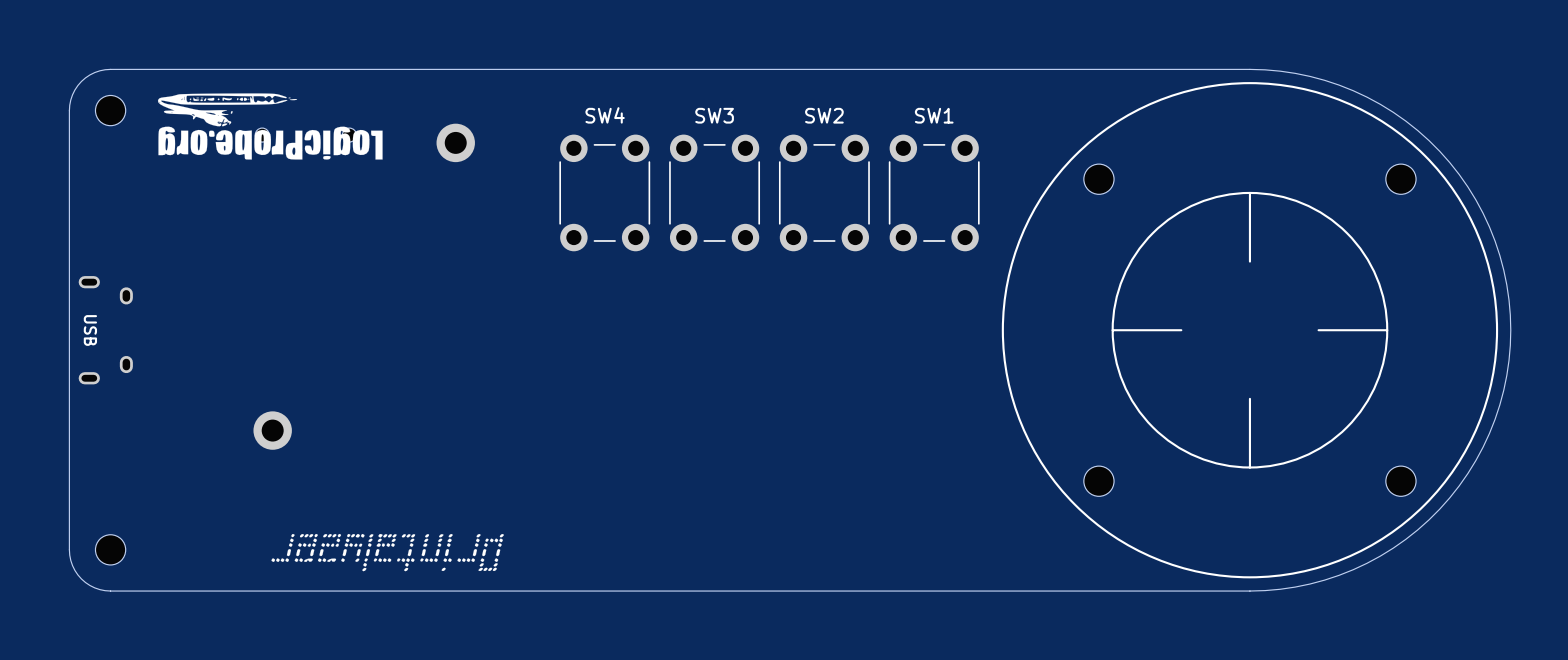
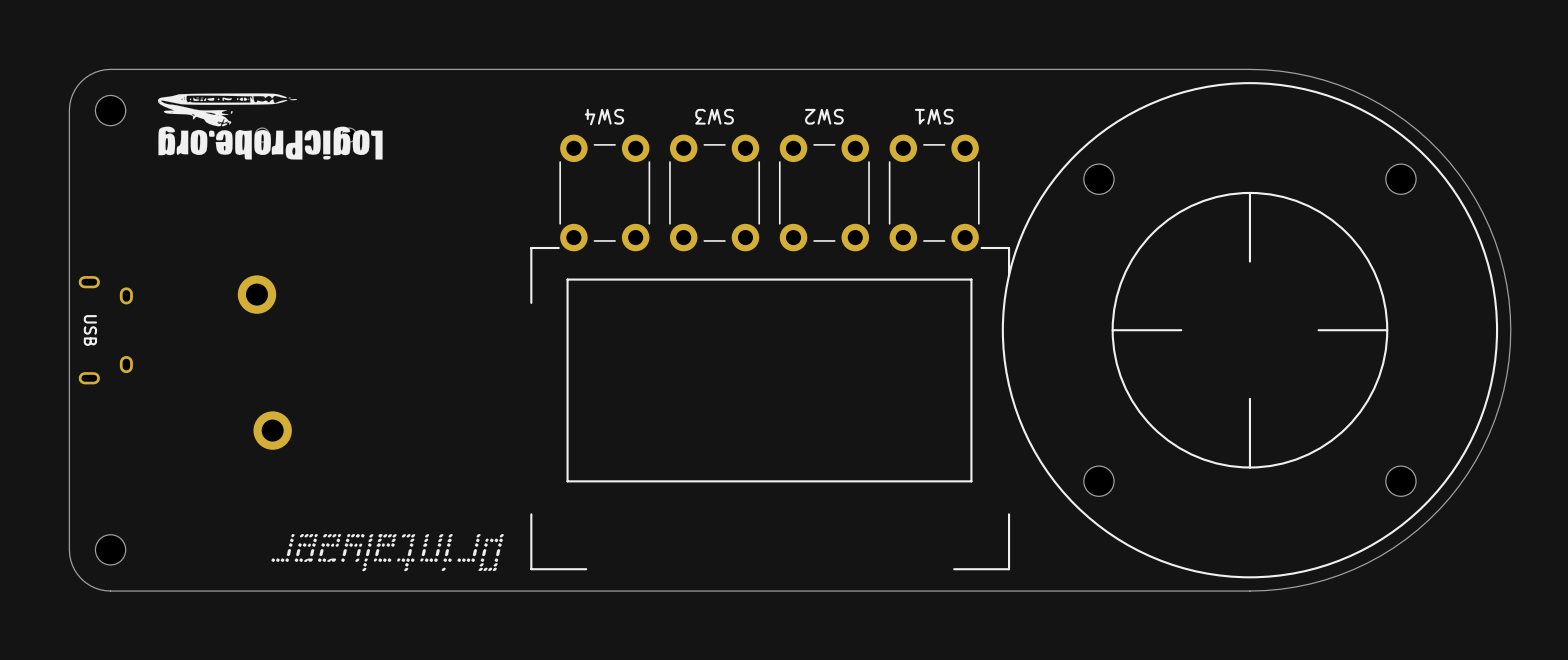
SW4 name rotation: 0° (605, 115) -> 180° (604, 117)
SW3 name rotation: 0° (714, 115) -> 180° (714, 116)
SW2 name rotation: 0° (824, 115) -> 180° (824, 116)
SW1 name rotation: 0° (934, 115) -> 180° (934, 116)
part position: (455, 142) -> (256, 294)
line: none -> (558, 247) (531, 247) (531, 302)
line: none -> (981, 247) (1009, 247) (1009, 275)
line: none -> (971, 279) (971, 481) (567, 481) (567, 279) (971, 279)
line: none -> (531, 514) (531, 569) (586, 569)
line: none -> (1009, 514) (1009, 569) (954, 569)

